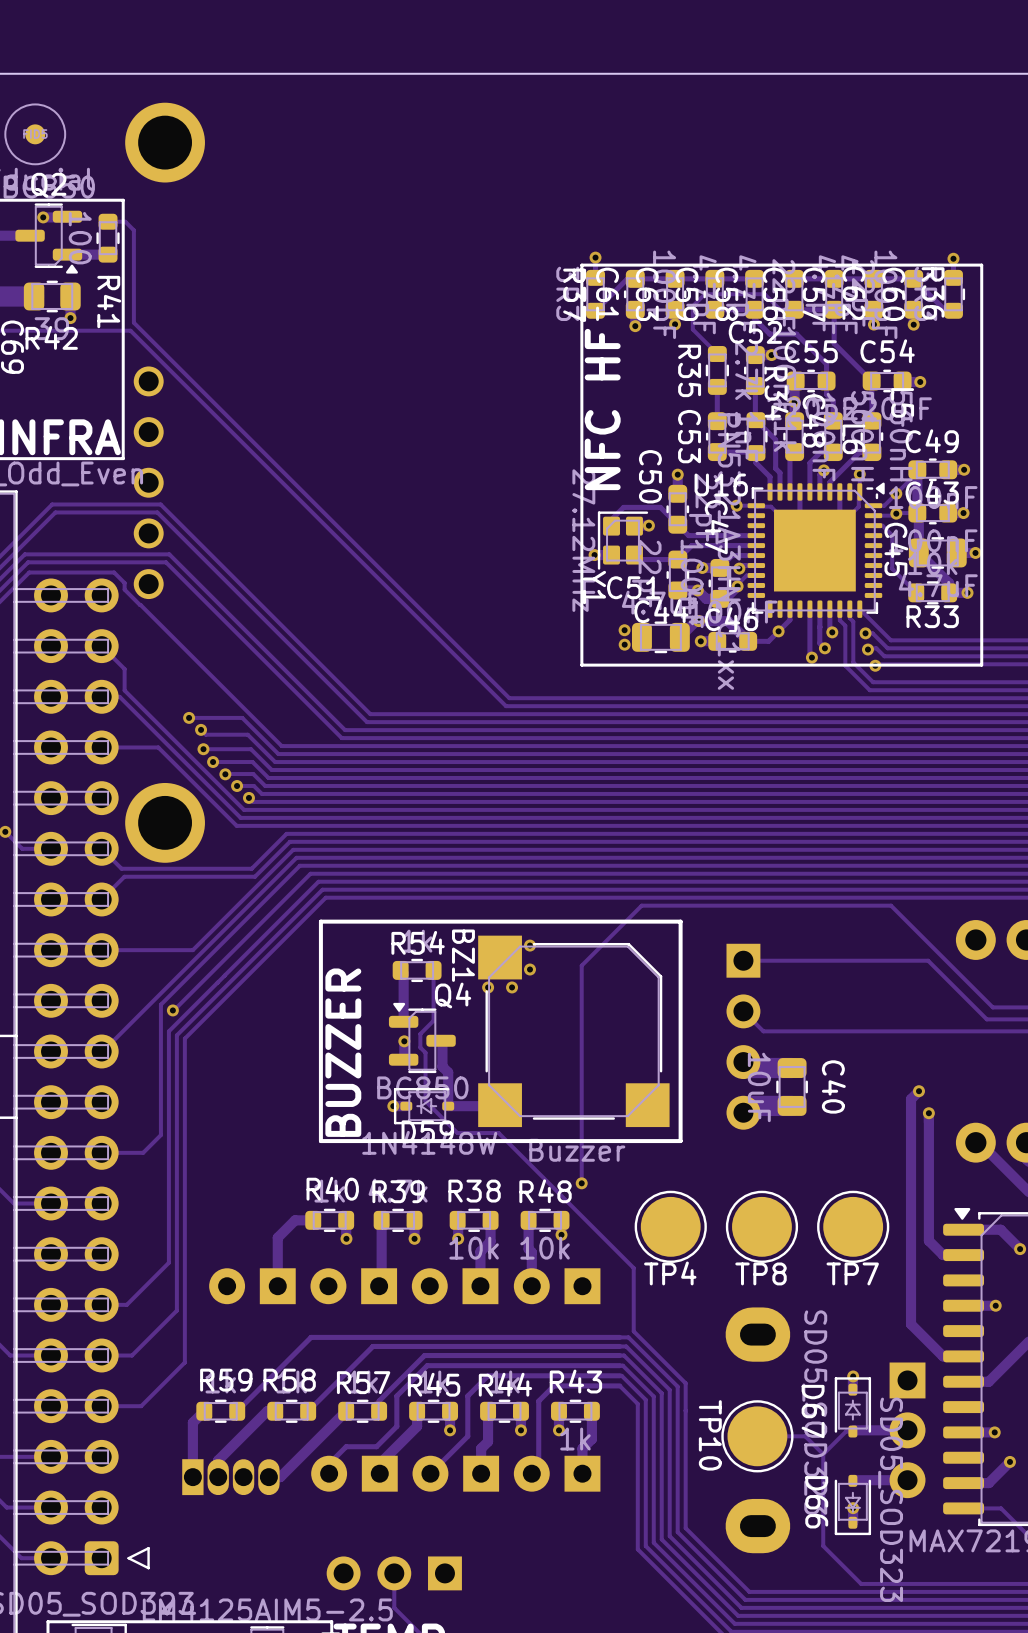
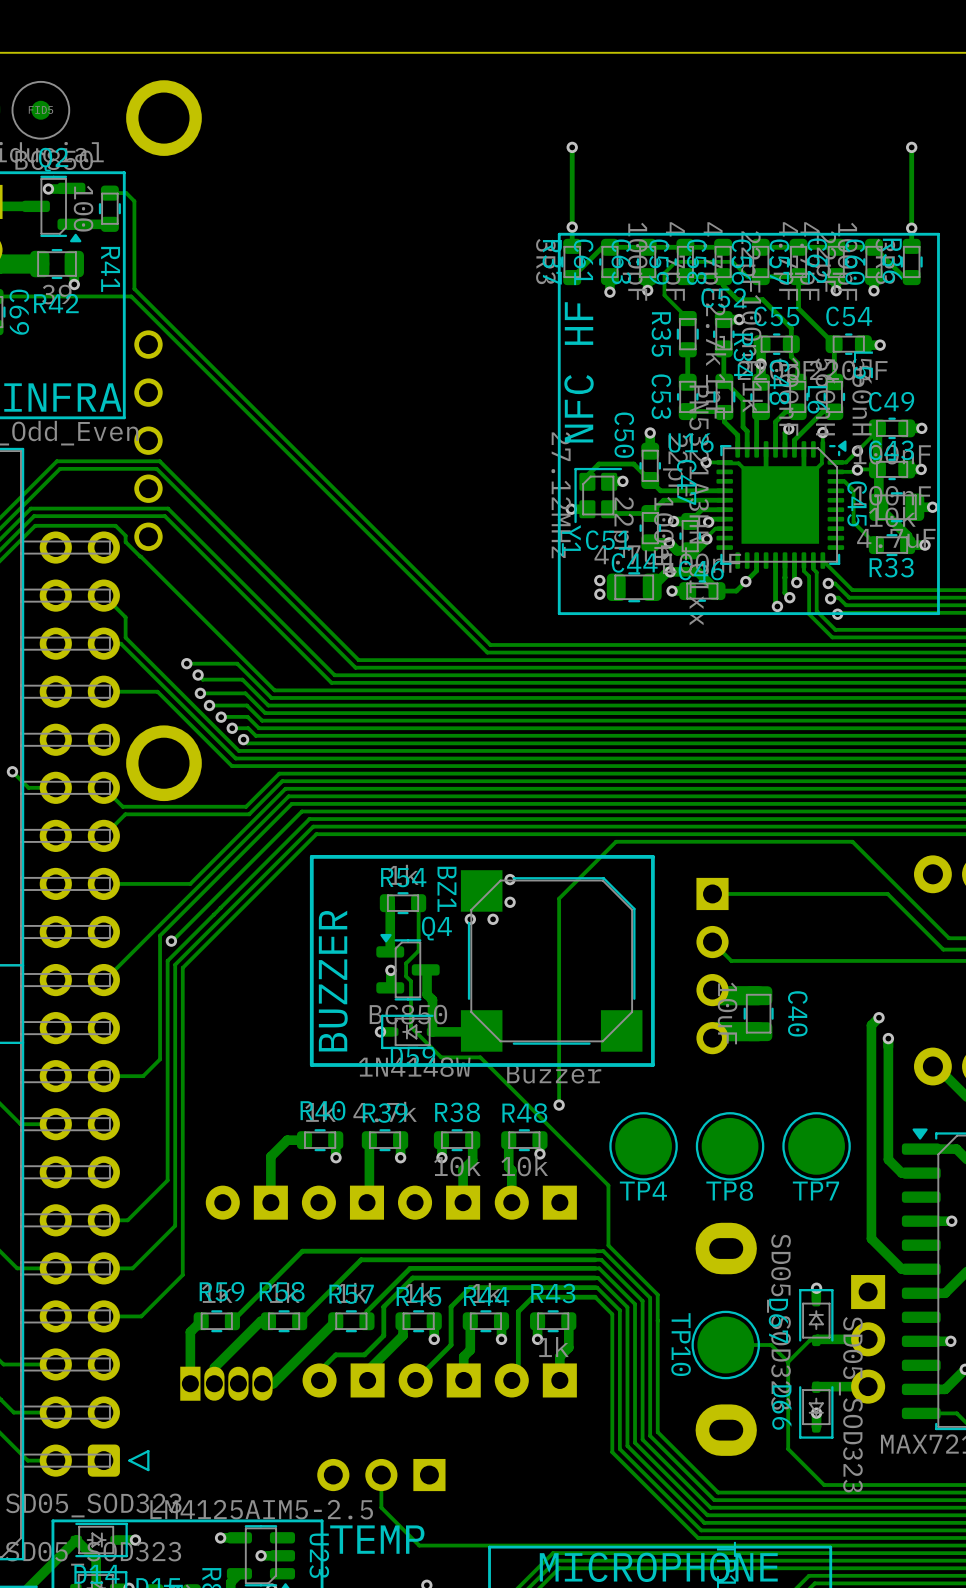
track: none -> (572, 147) (572, 227)
via: none -> (572, 147)
track: none -> (911, 147) (911, 228)
via: none -> (911, 147)

